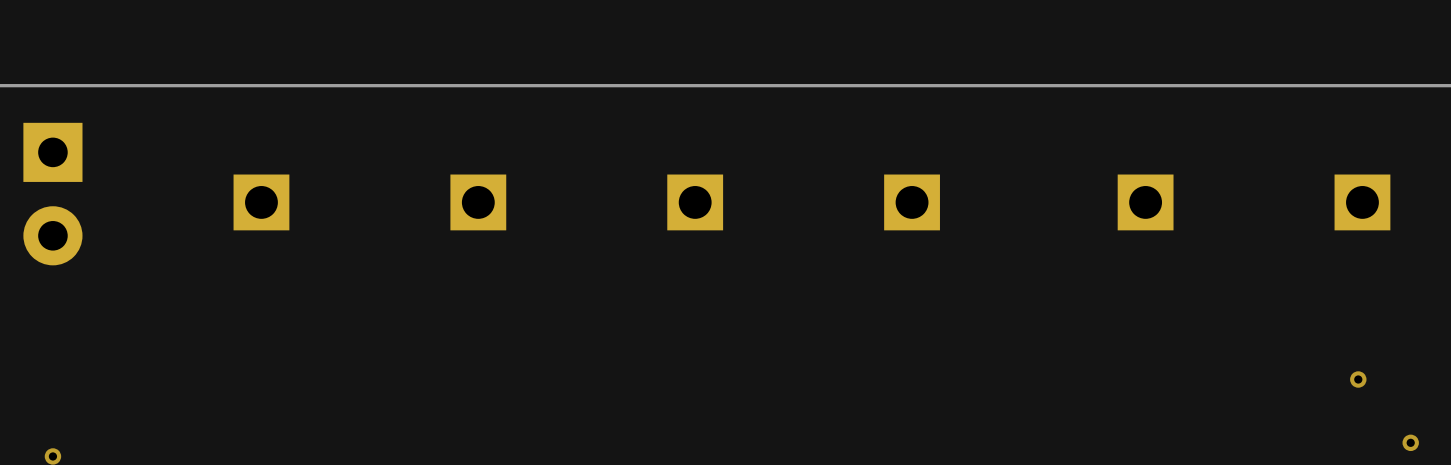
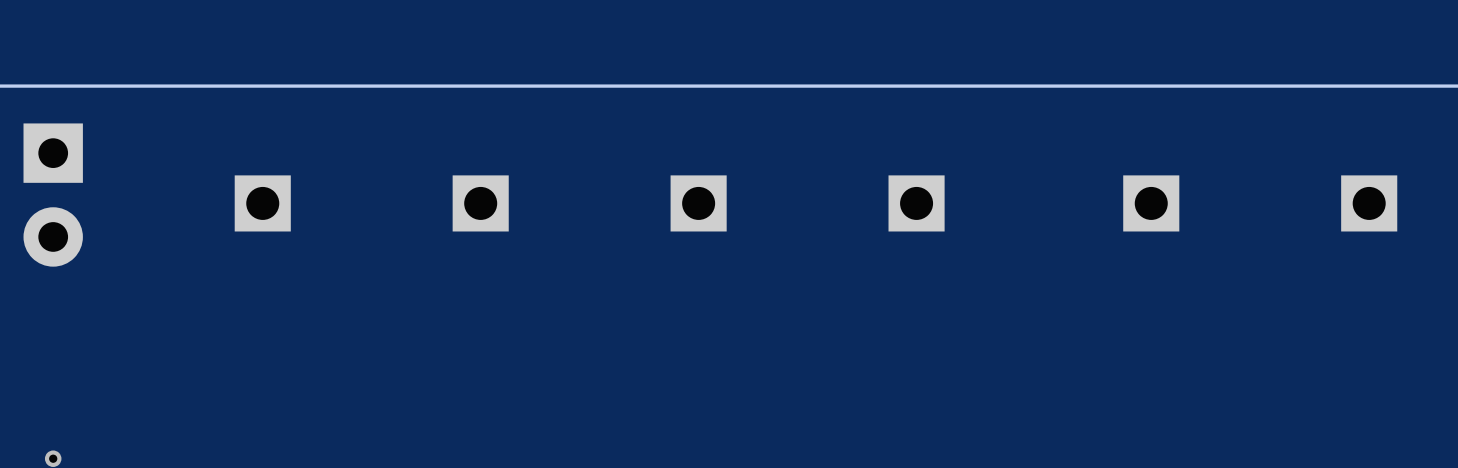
via: (1358, 379) -> none
via: (1410, 442) -> none

